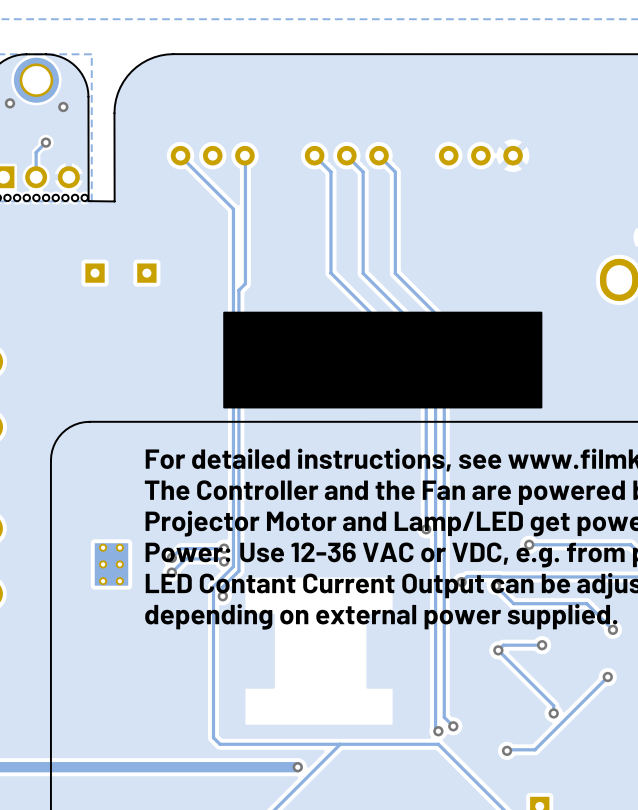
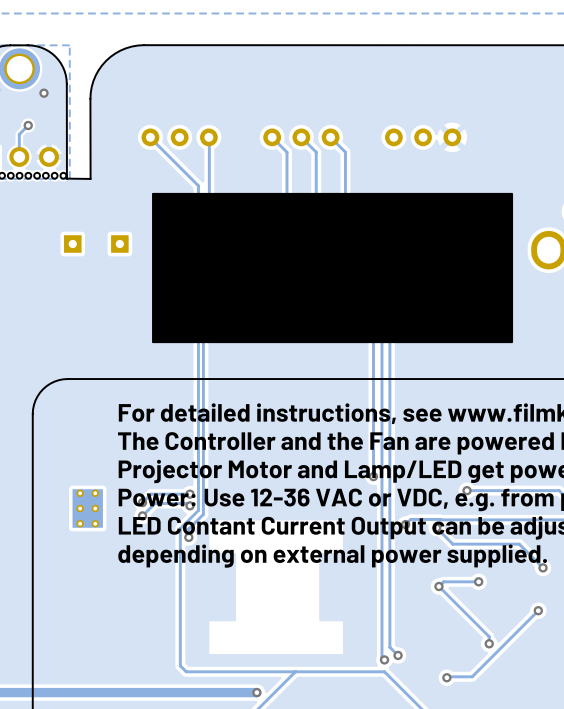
drawing: none -> [152, 192, 514, 344]
drawing: [223, 311, 543, 409] -> none

